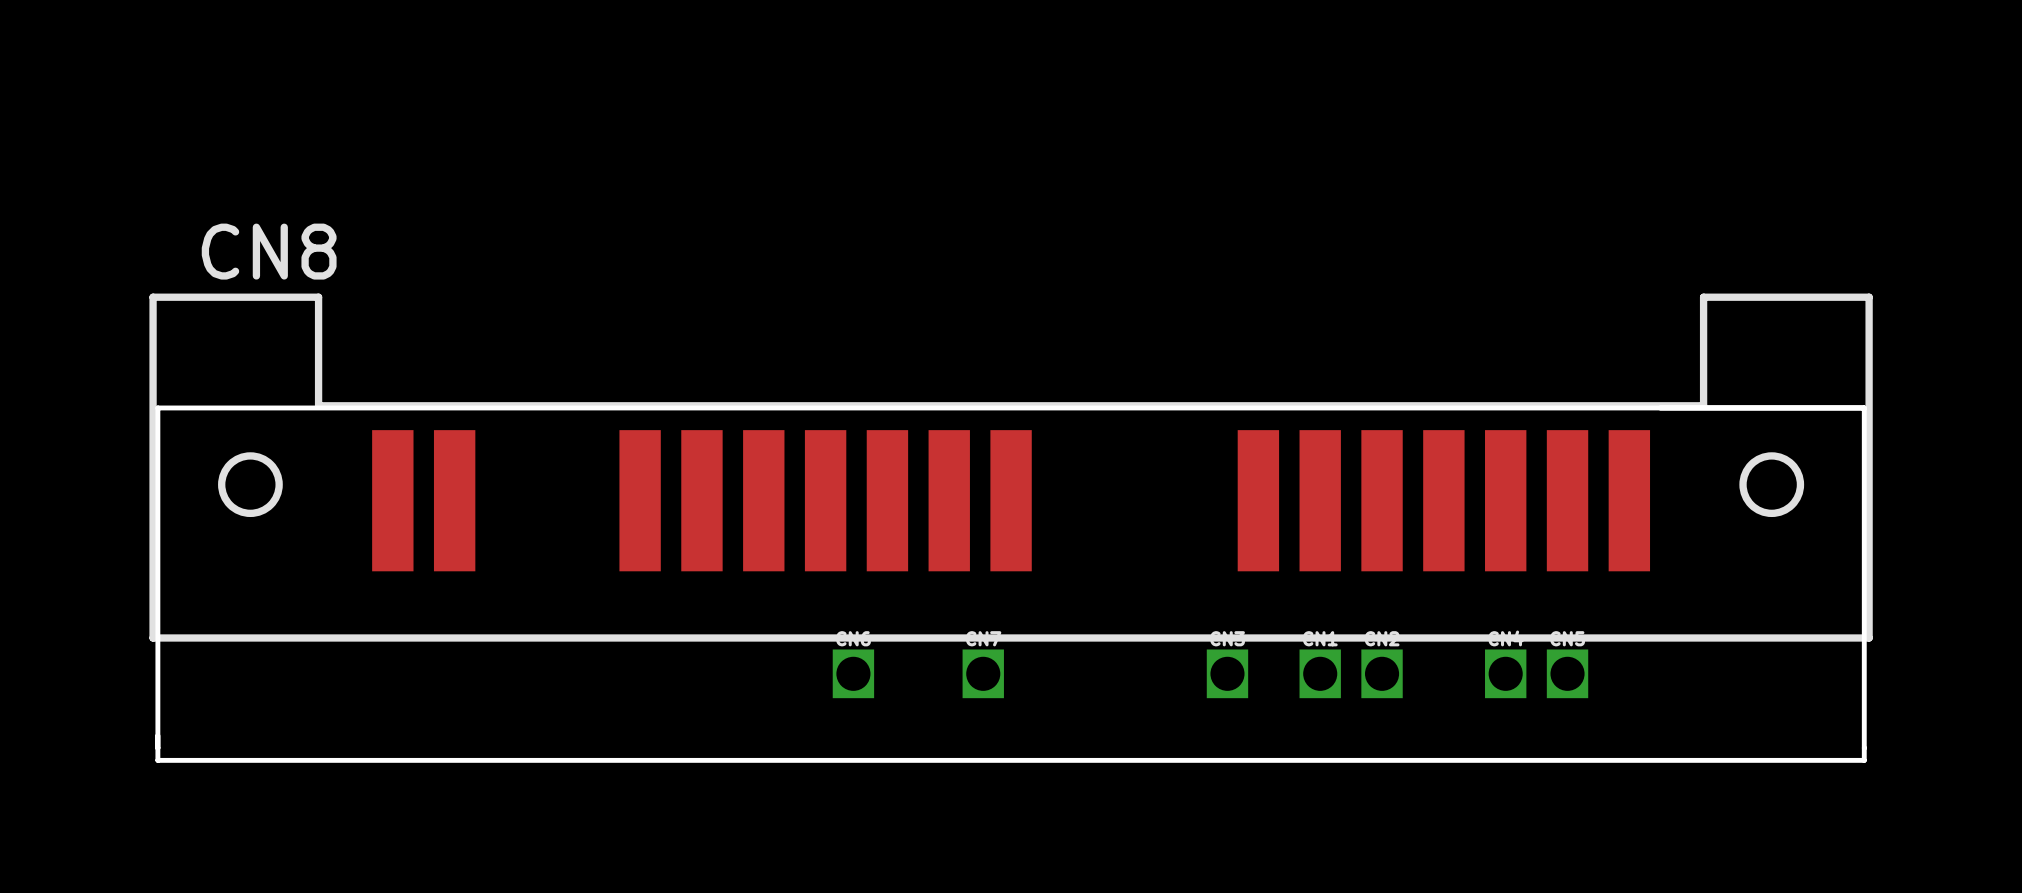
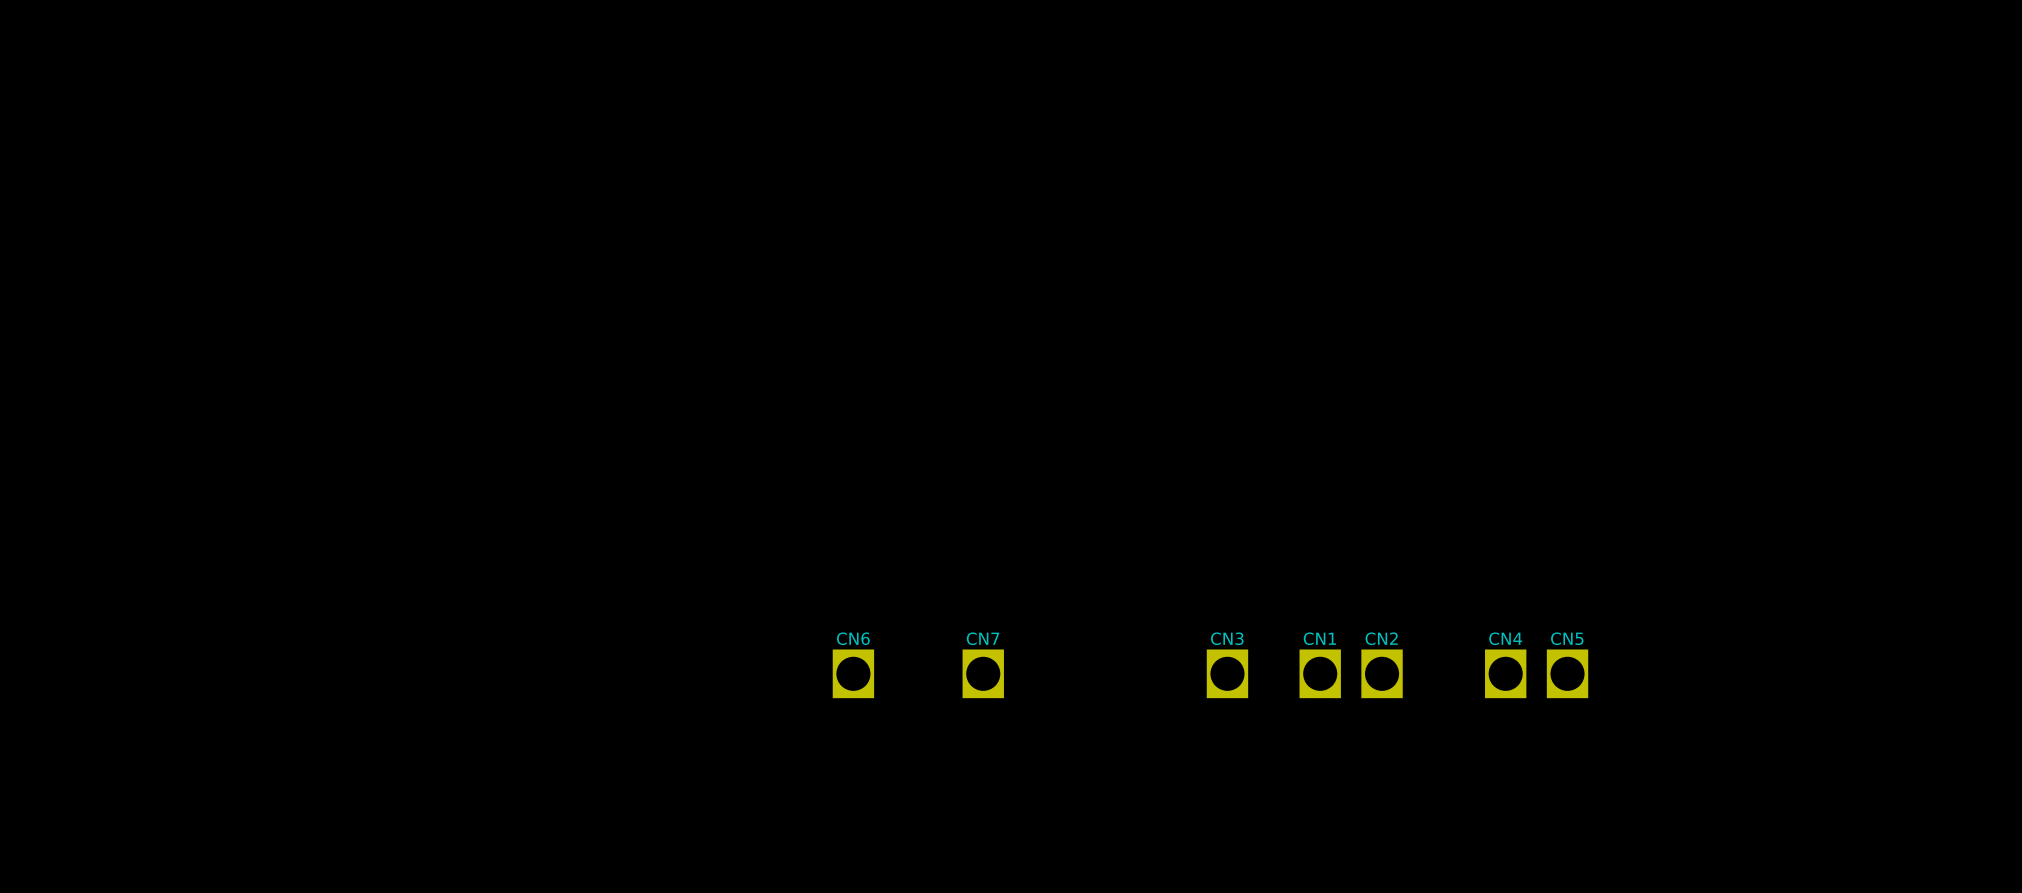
board edge: (157, 407) (157, 760) (1864, 760) (1864, 407) (157, 407) -> none
CN8: (1011, 467) -> none

